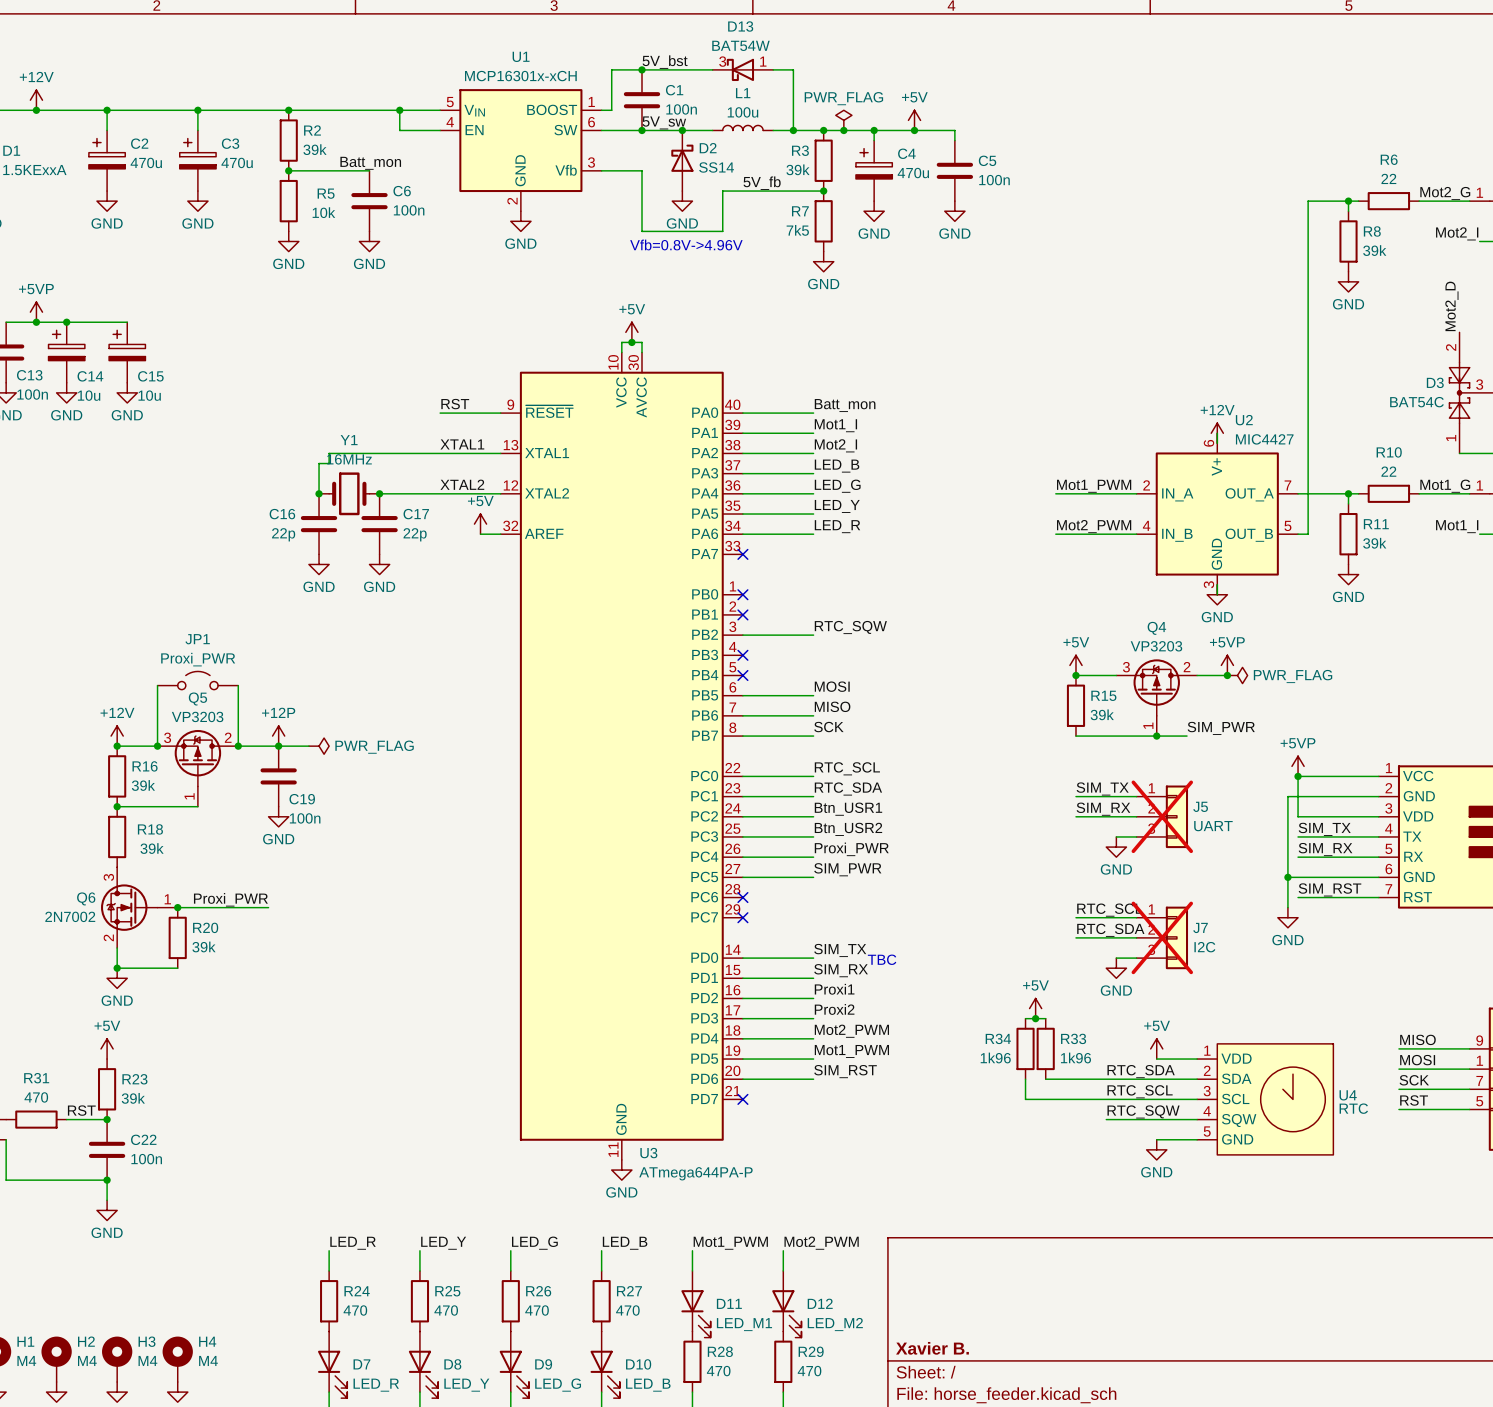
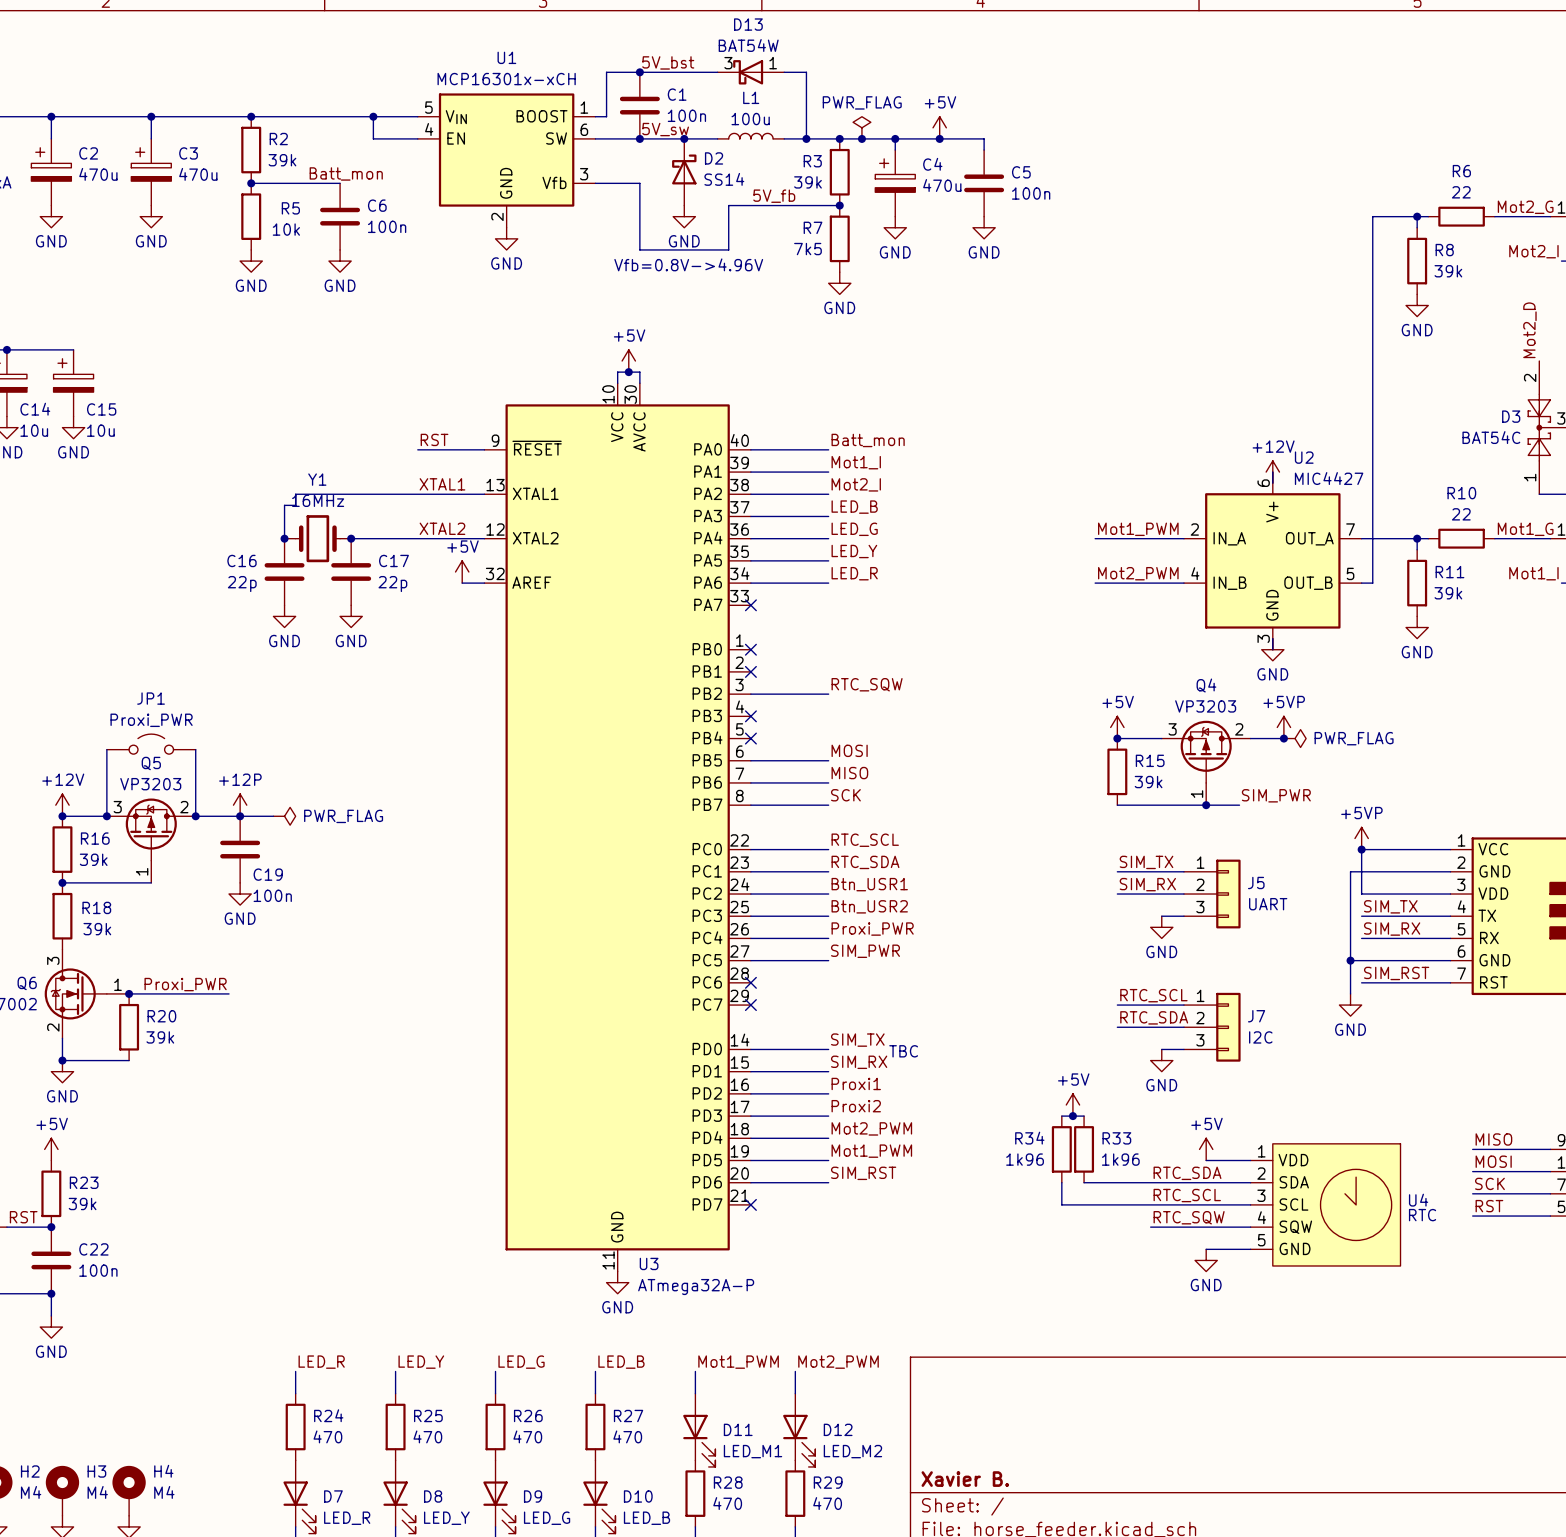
J5 do-not-place cross: (1162, 816) -> none
J7 do-not-place cross: (1162, 937) -> none
U3 value: ATmega644PA-P (695, 1173) -> ATmega32A-P (696, 1287)

